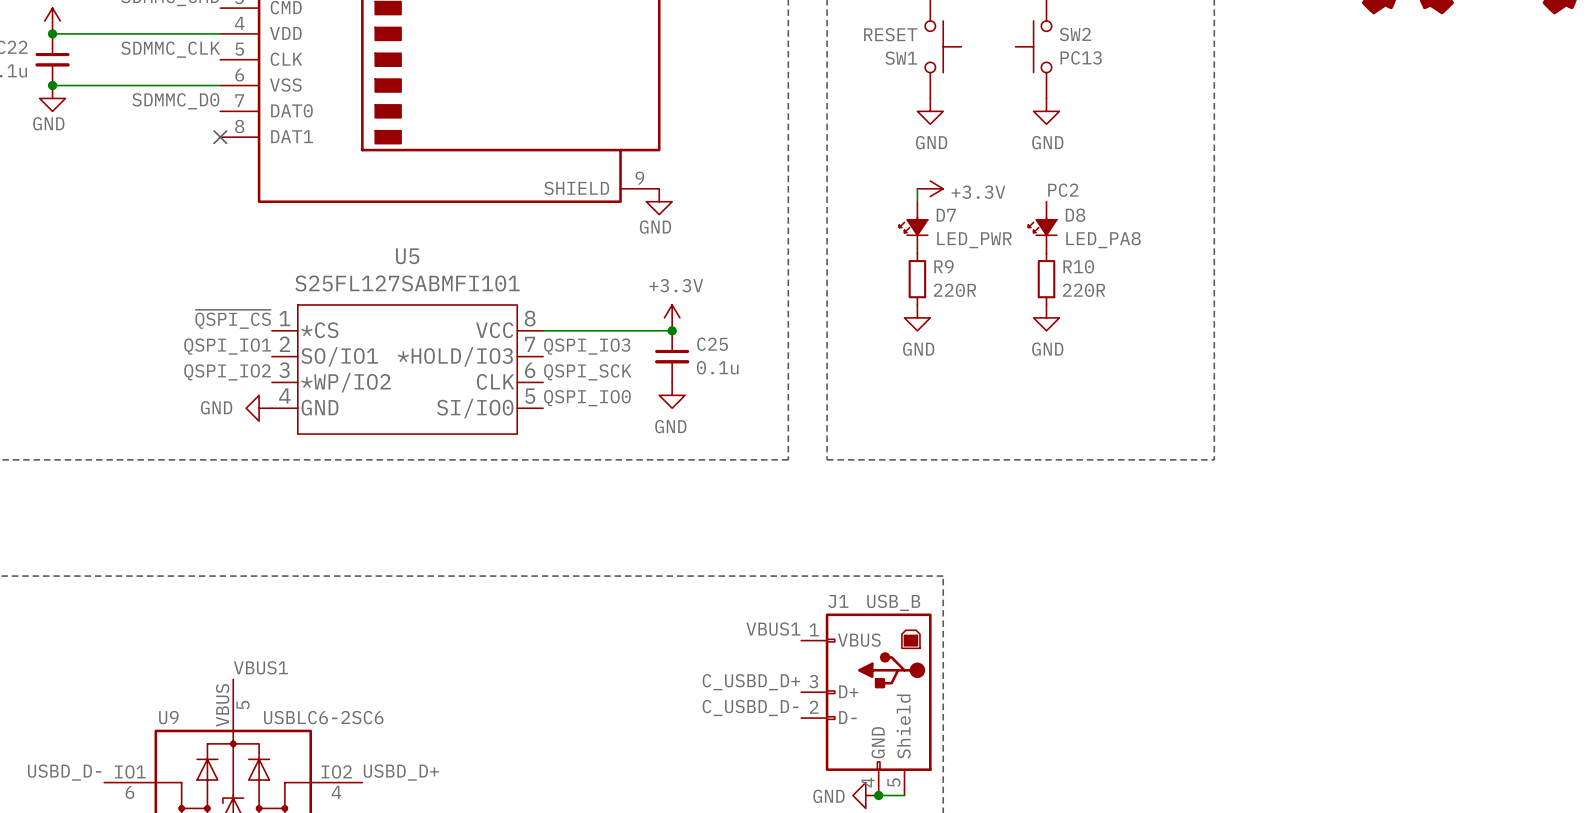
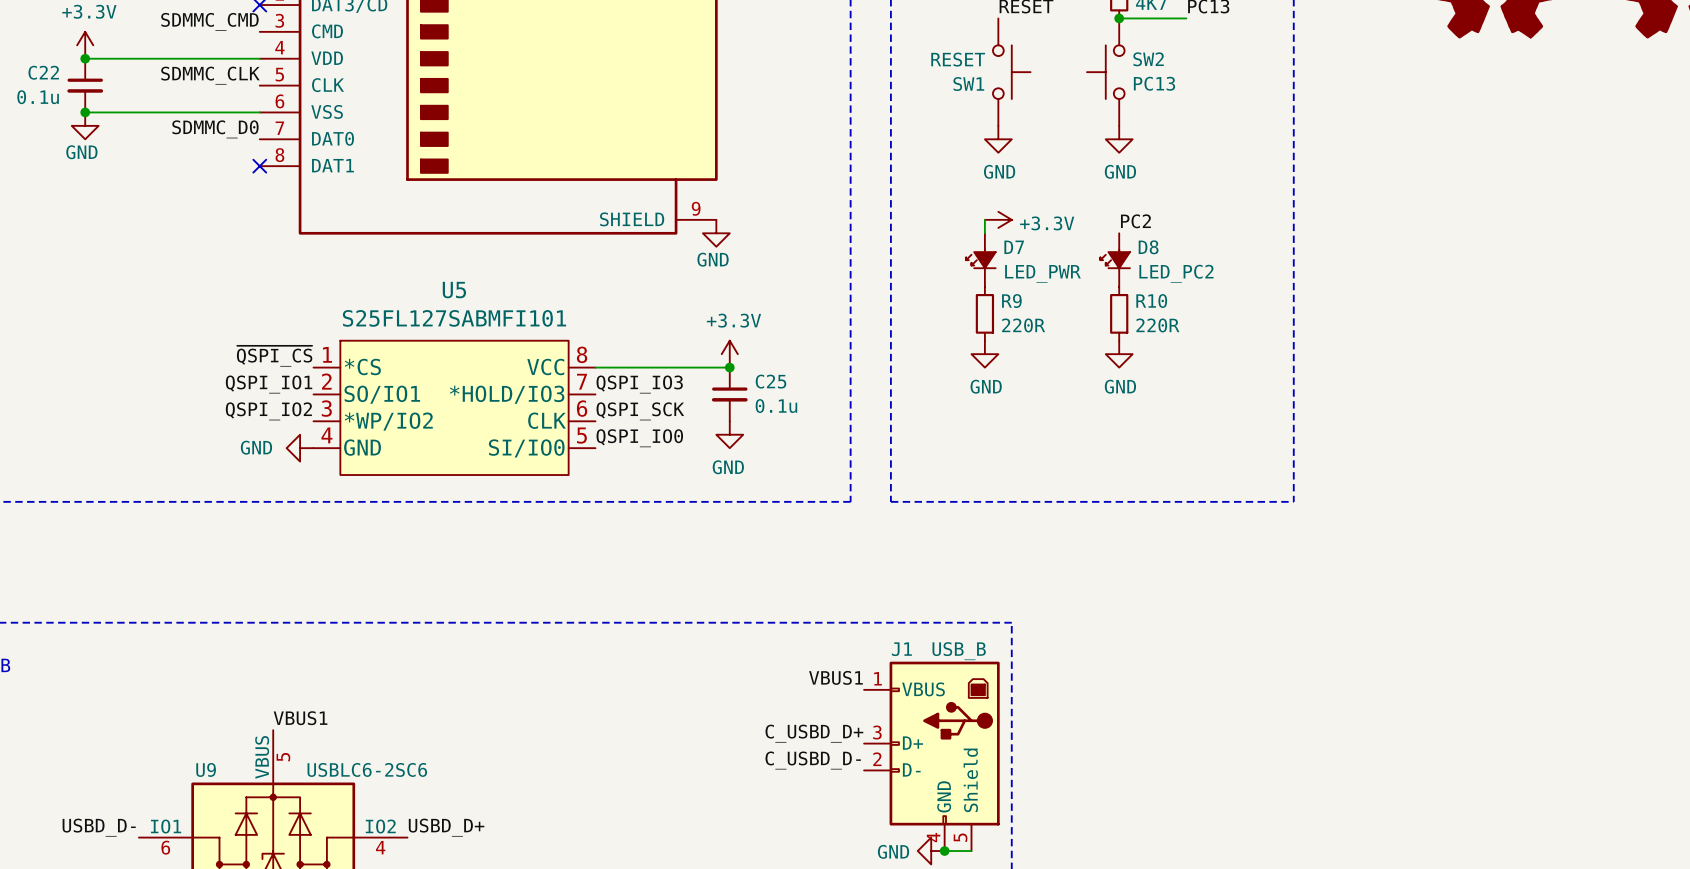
D8 value: LED_PA8 (1103, 240) -> LED_PC2 (1176, 273)

